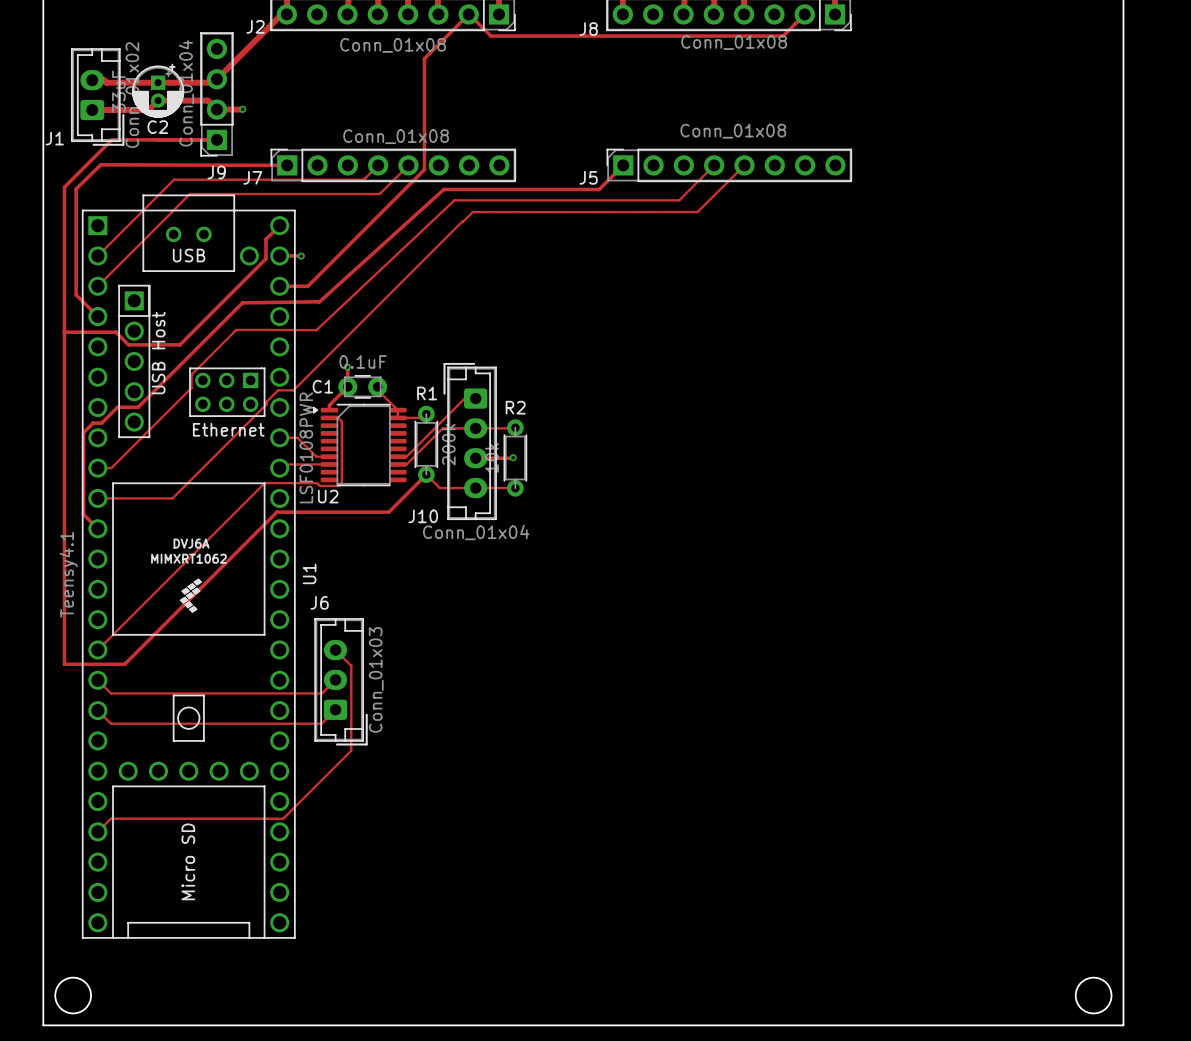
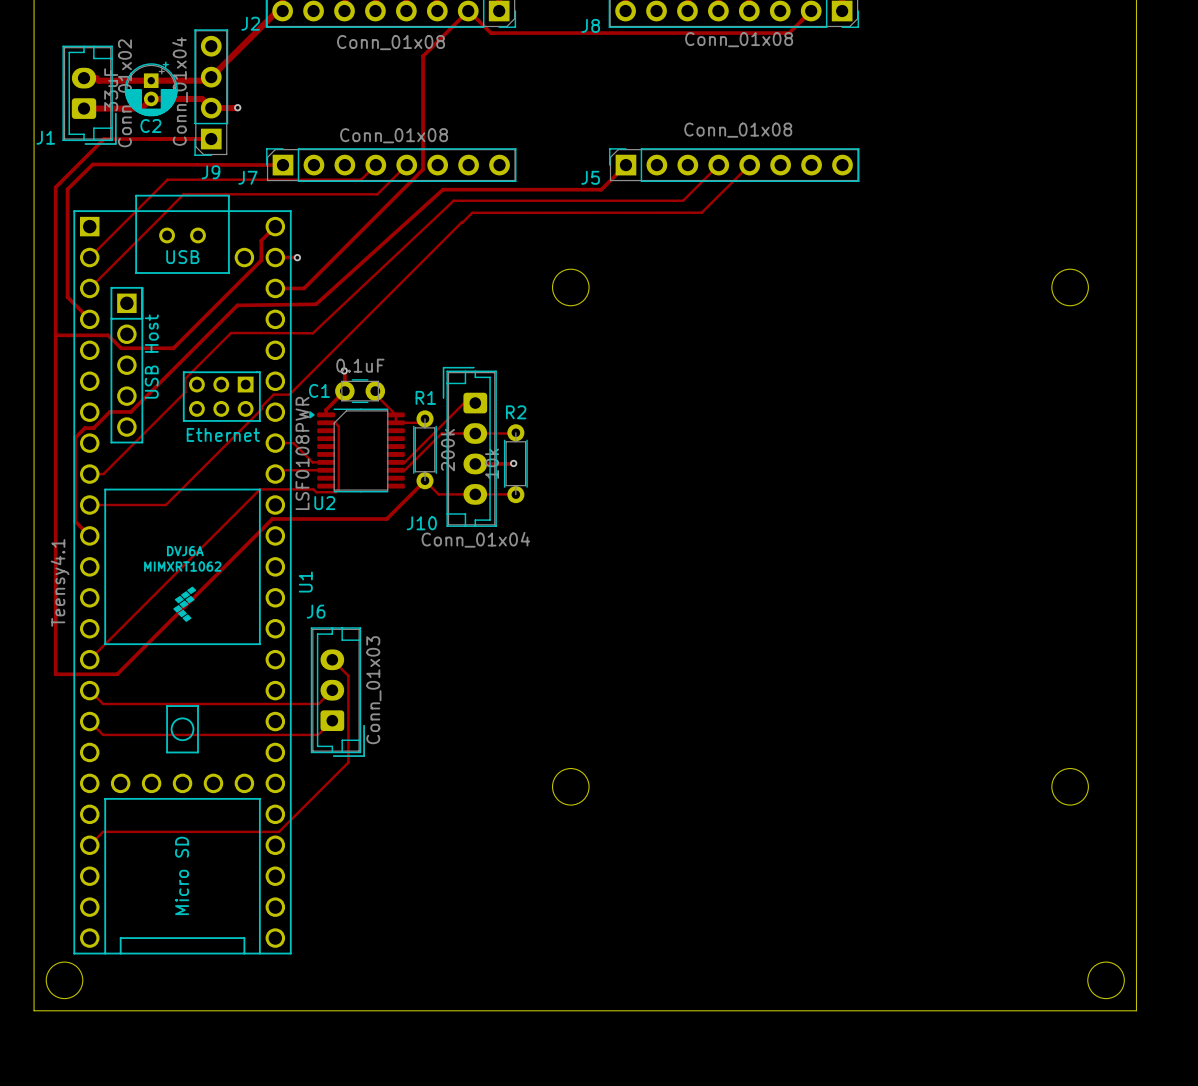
round board edge: none -> [552, 268, 590, 307]
round board edge: none -> [1051, 268, 1089, 307]
round board edge: none -> [552, 768, 590, 806]
round board edge: none -> [1051, 768, 1089, 806]
board edge: (43, 994) (43, 1025) (1123, 1025) (1123, 994) -> (34, 1010) (1136, 1010)
round board edge position: (73, 995) -> (64, 980)
round board edge position: (1093, 995) -> (1106, 980)

